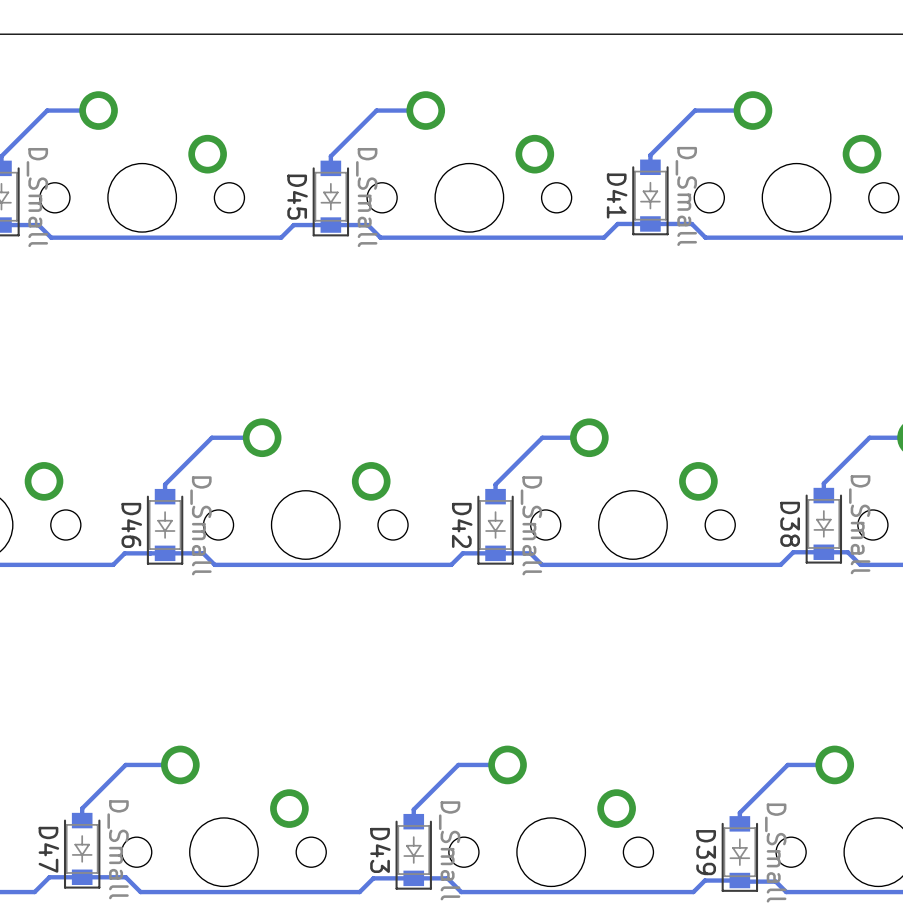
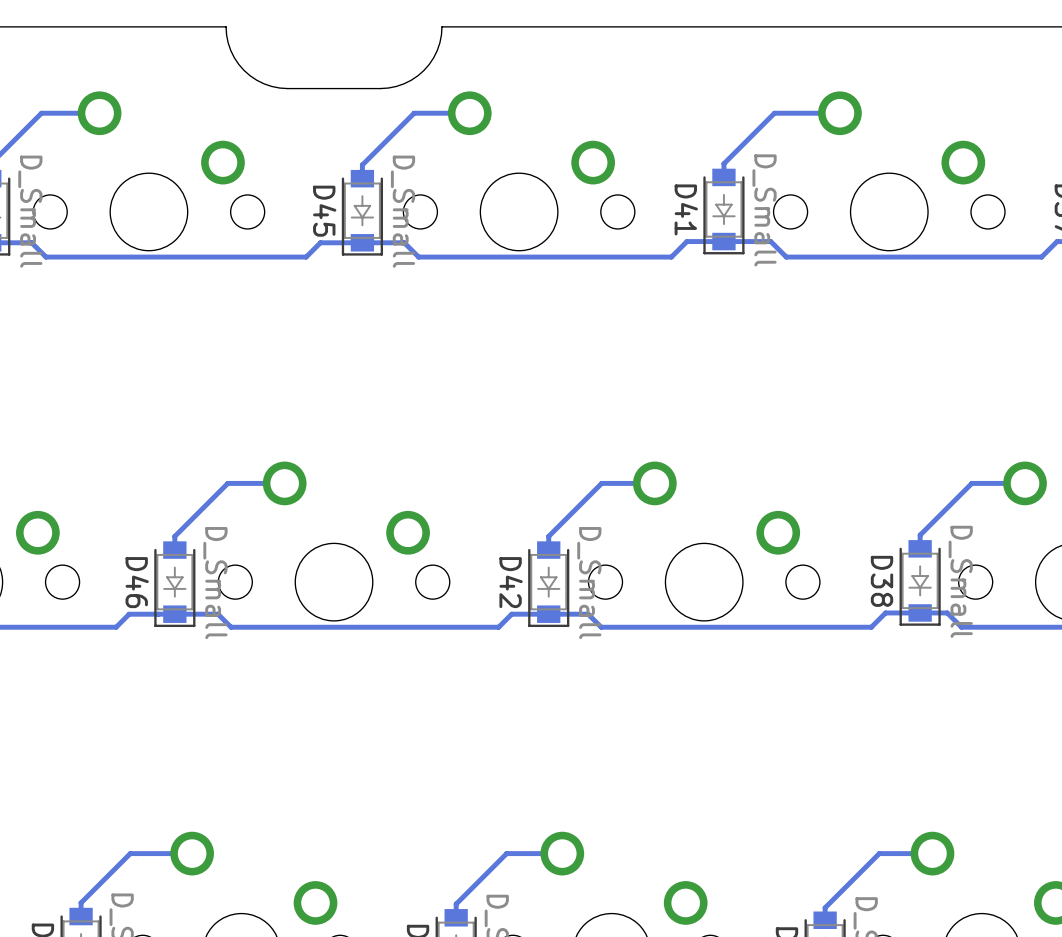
board edge: (401, 34) (210, 34) -> (380, 88) (287, 88) (264, 83) (250, 75) (234, 57) (228, 42) (226, 26)
board edge: none -> (441, 26) (437, 50) (423, 70) (403, 83) (380, 88)

